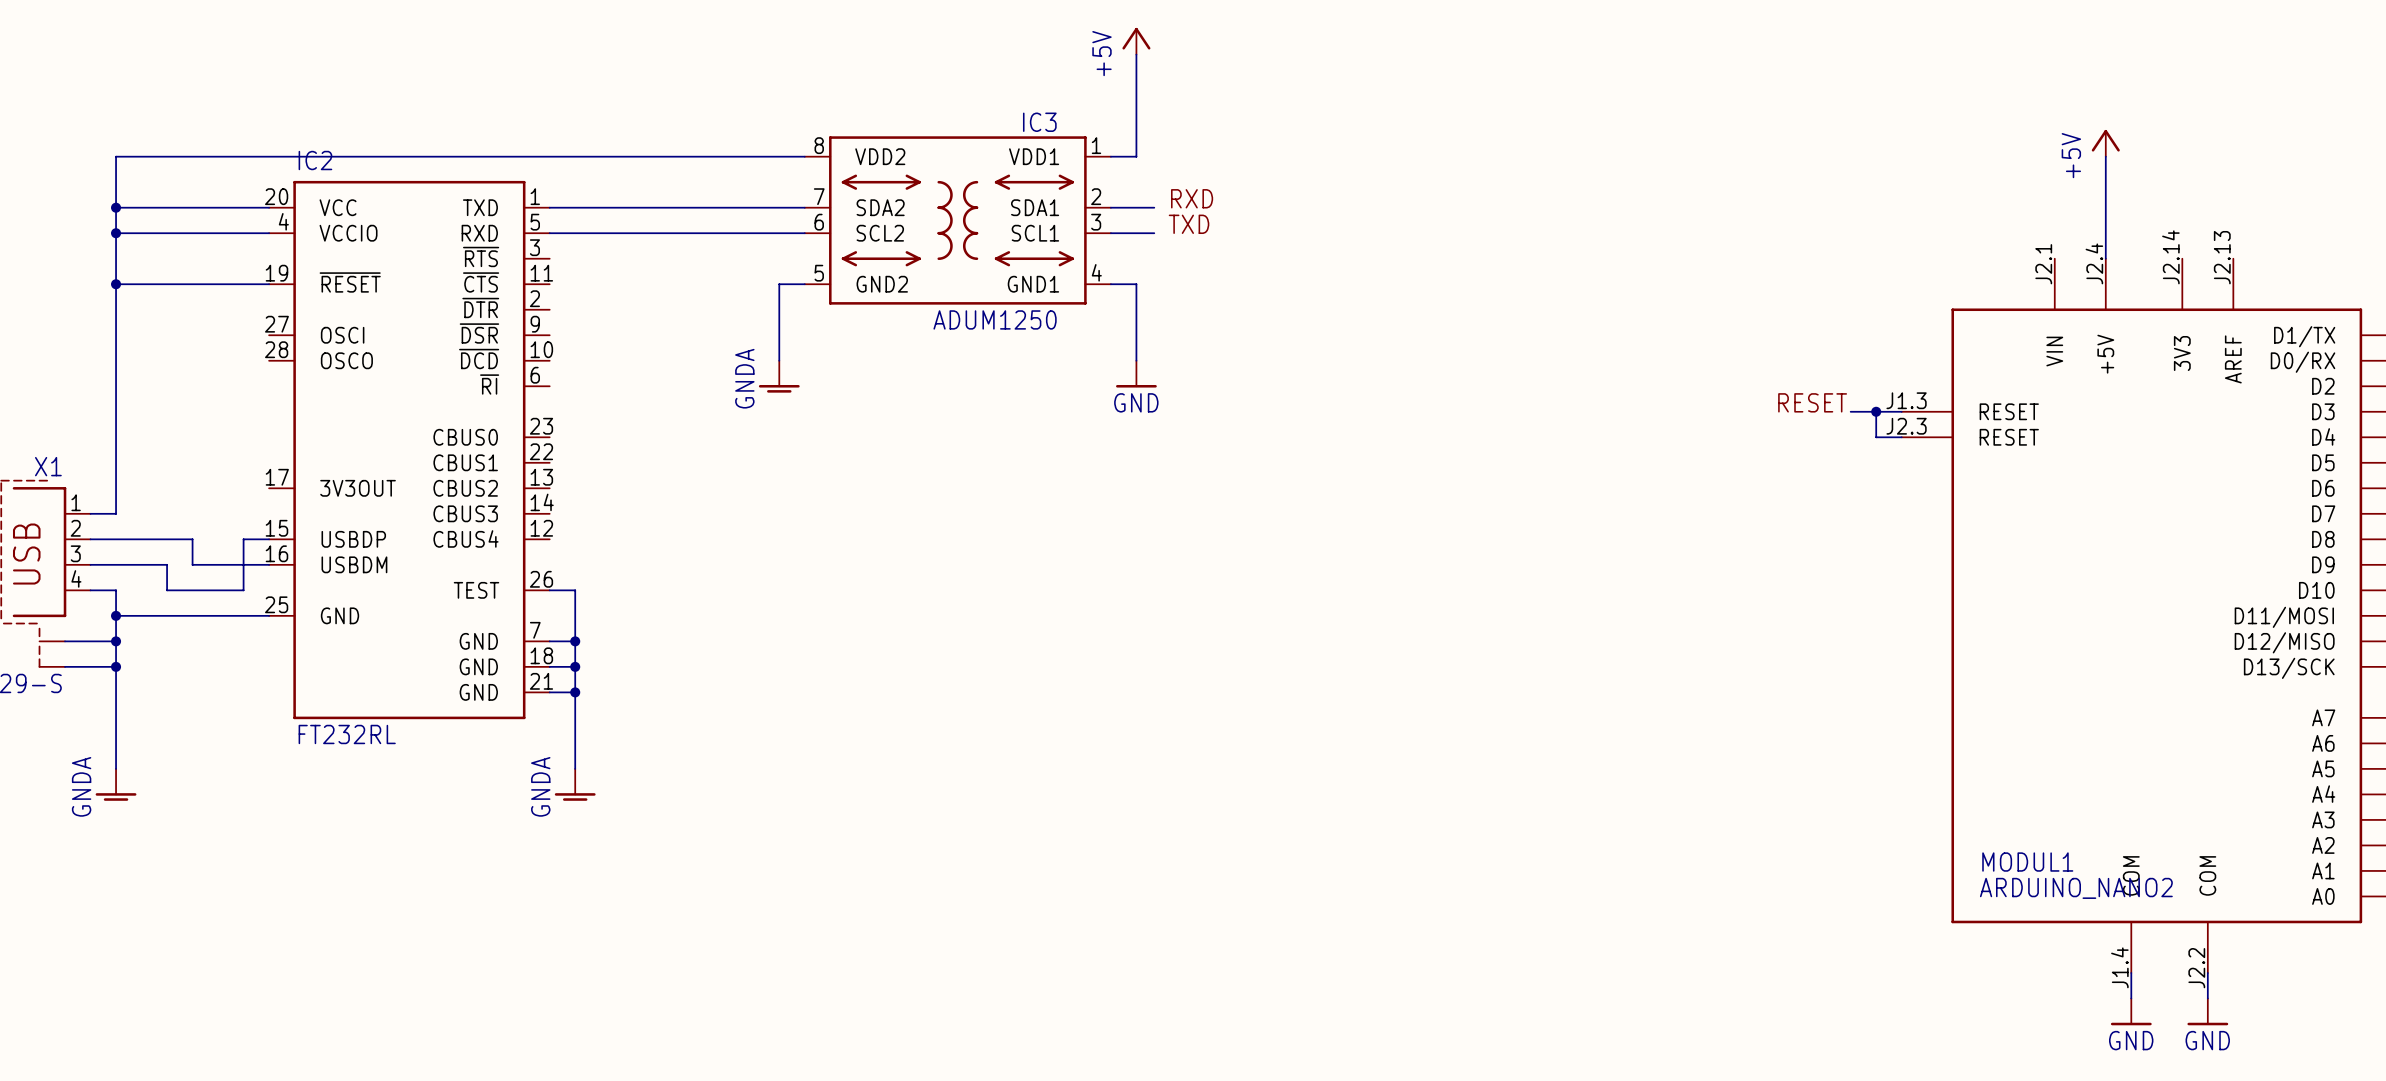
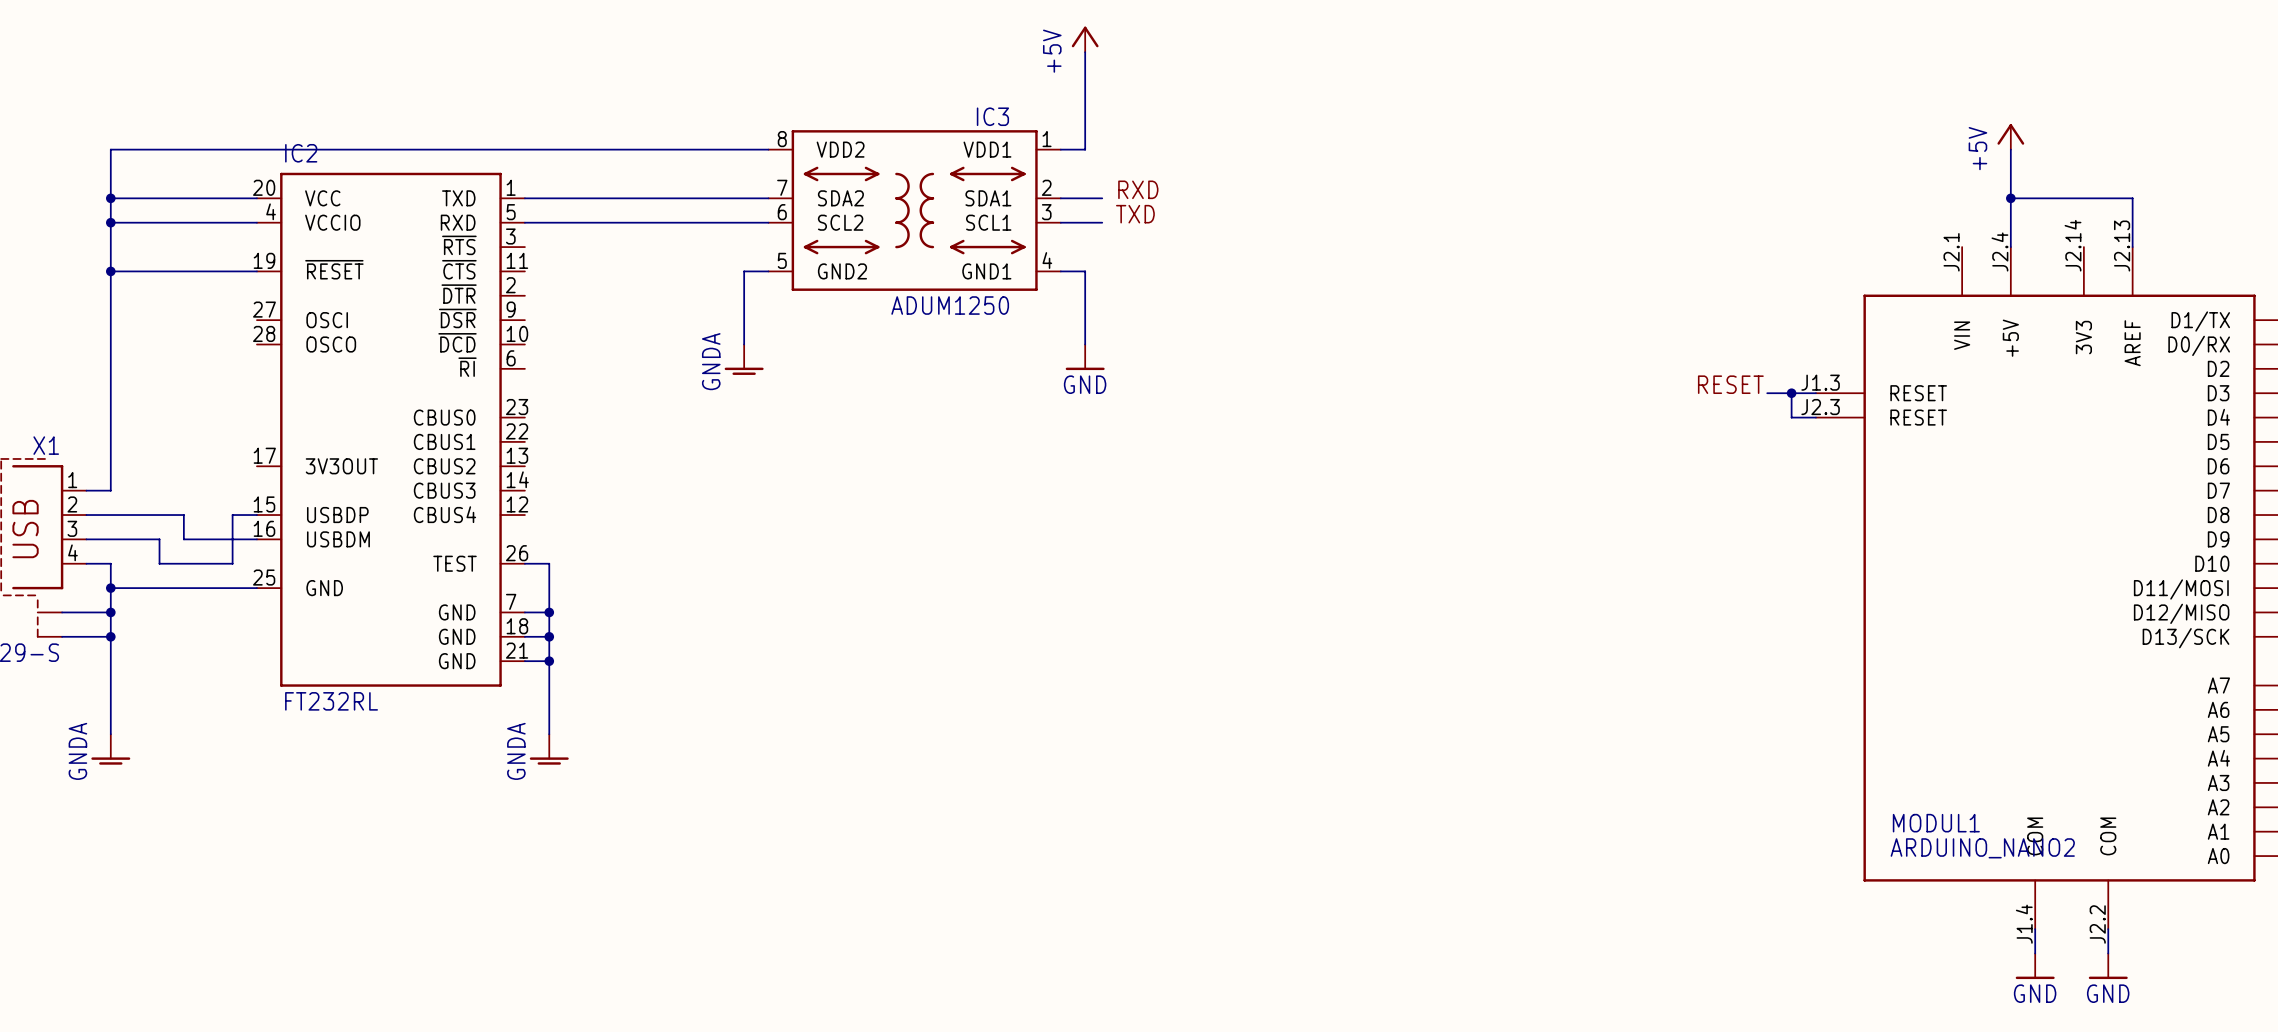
wire: none -> (2010, 198) (2132, 198) (2132, 247)
junction: none -> (2010, 198)

